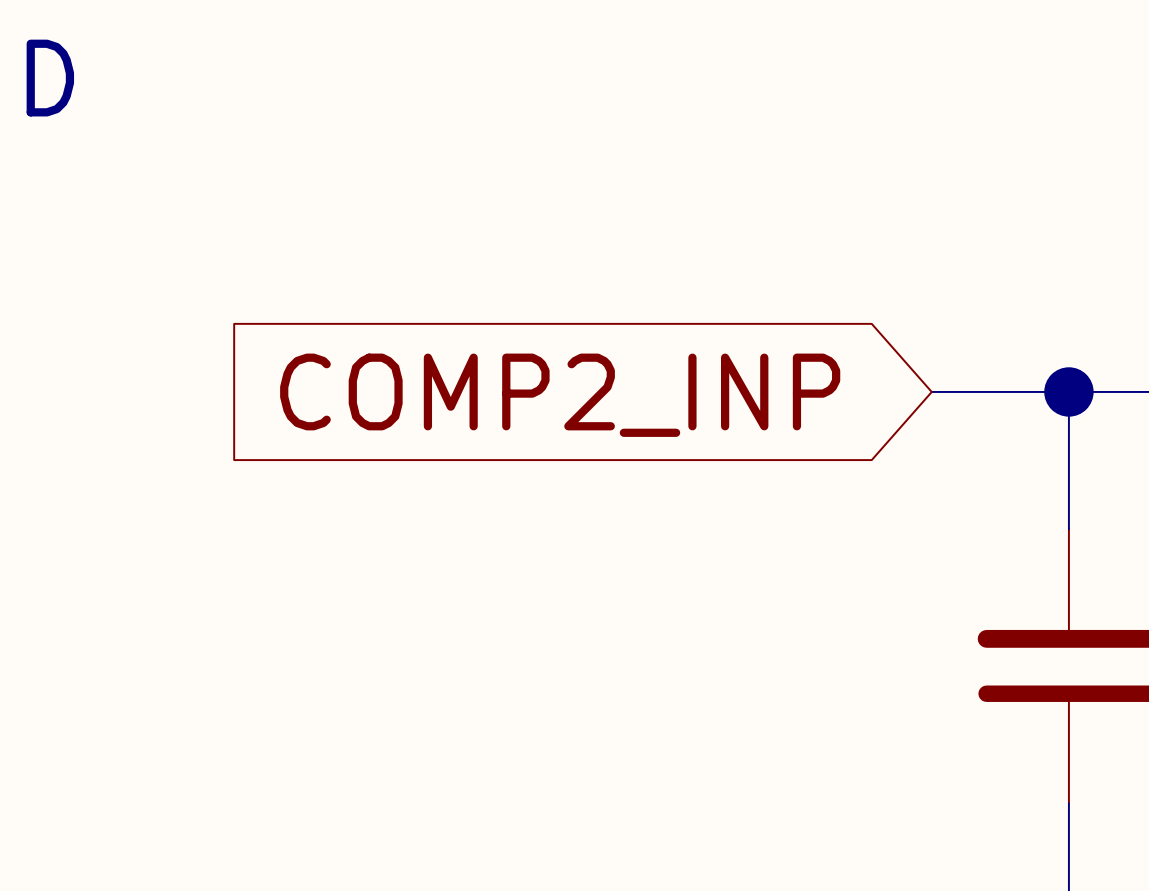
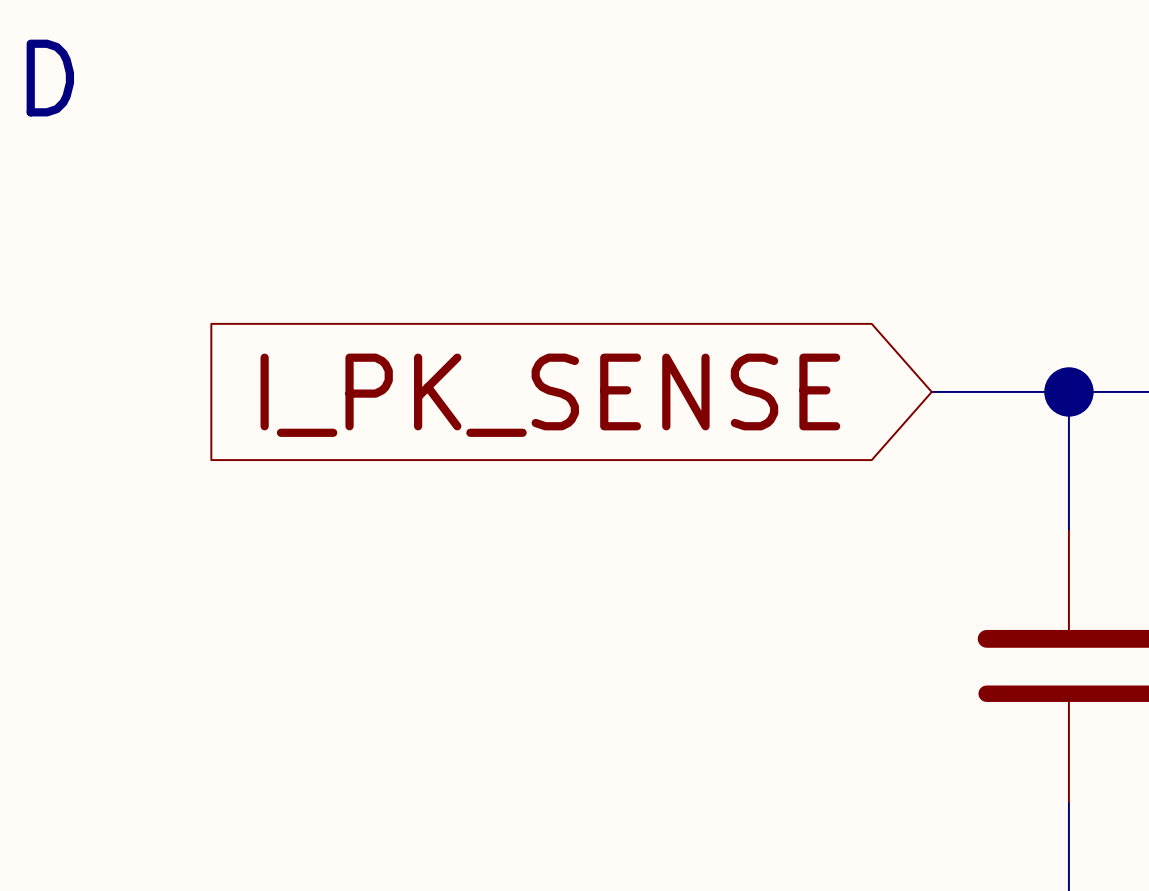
global label: COMP2_INP (560, 395) -> I_PK_SENSE (550, 395)

